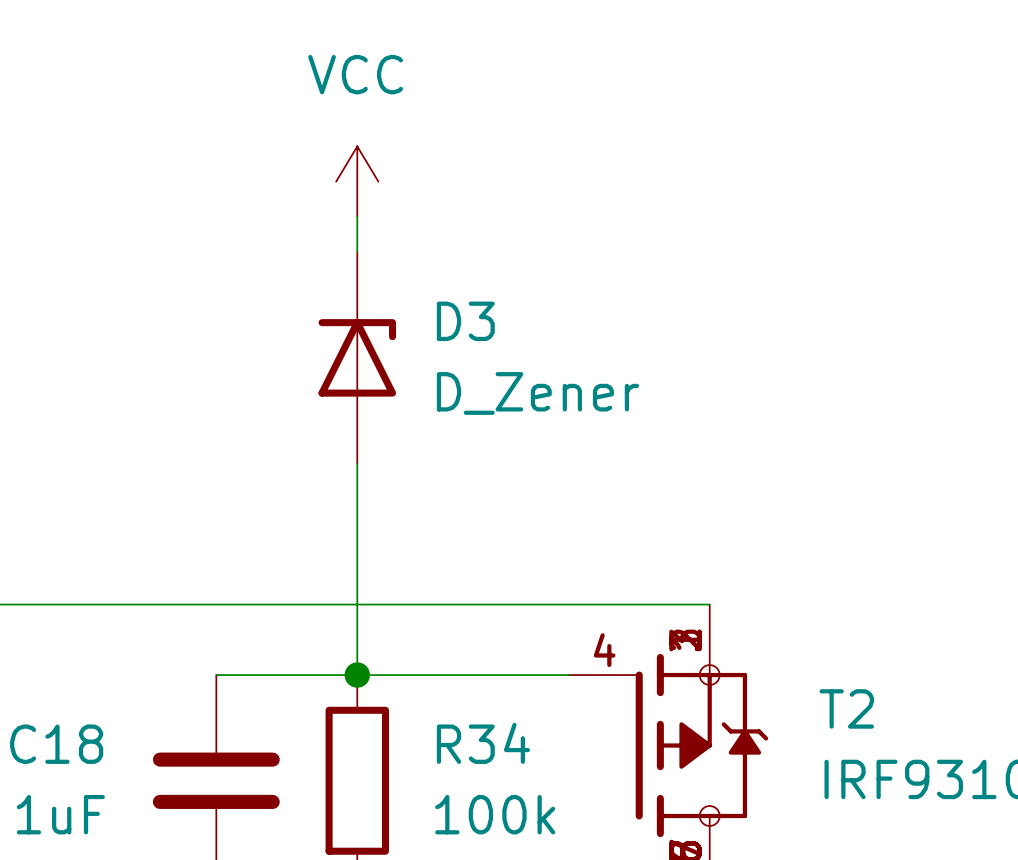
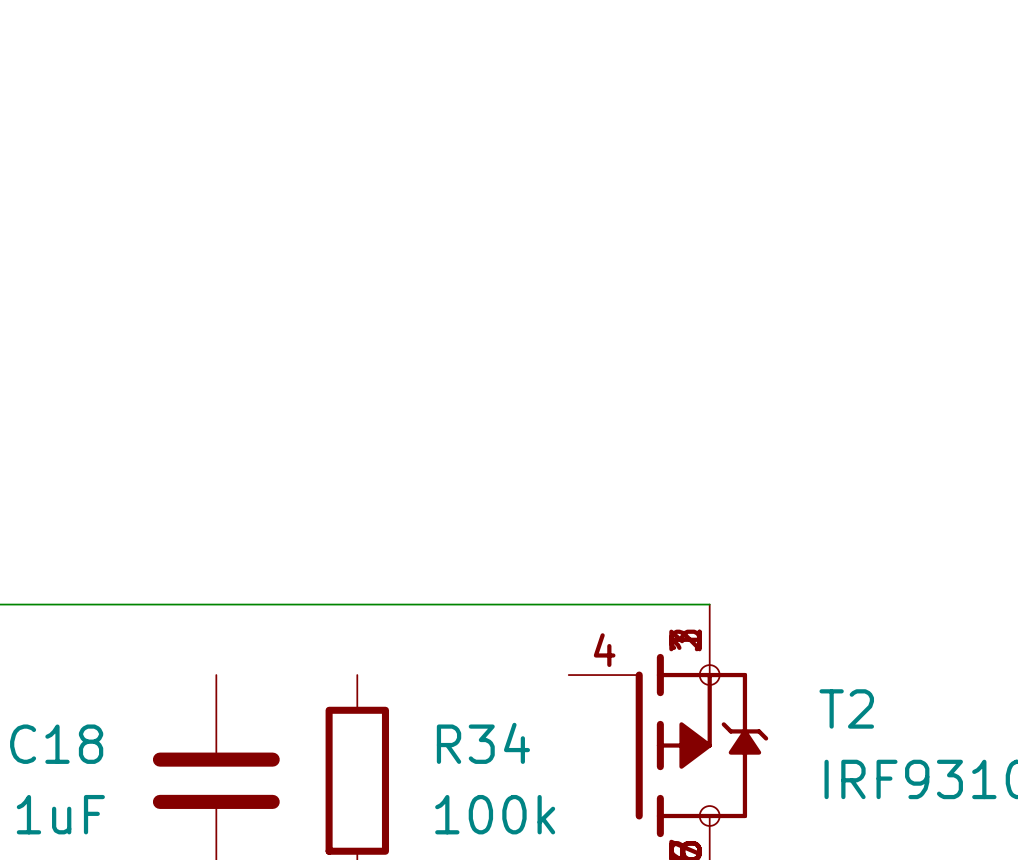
power symbol: VCC (357, 181) -> none
wire: (357, 216) (357, 252) -> none
D3: D_Zener (357, 357) -> none
wire: (357, 463) (357, 675) -> none
wire: (216, 675) (568, 675) -> none
junction: (357, 675) -> none

